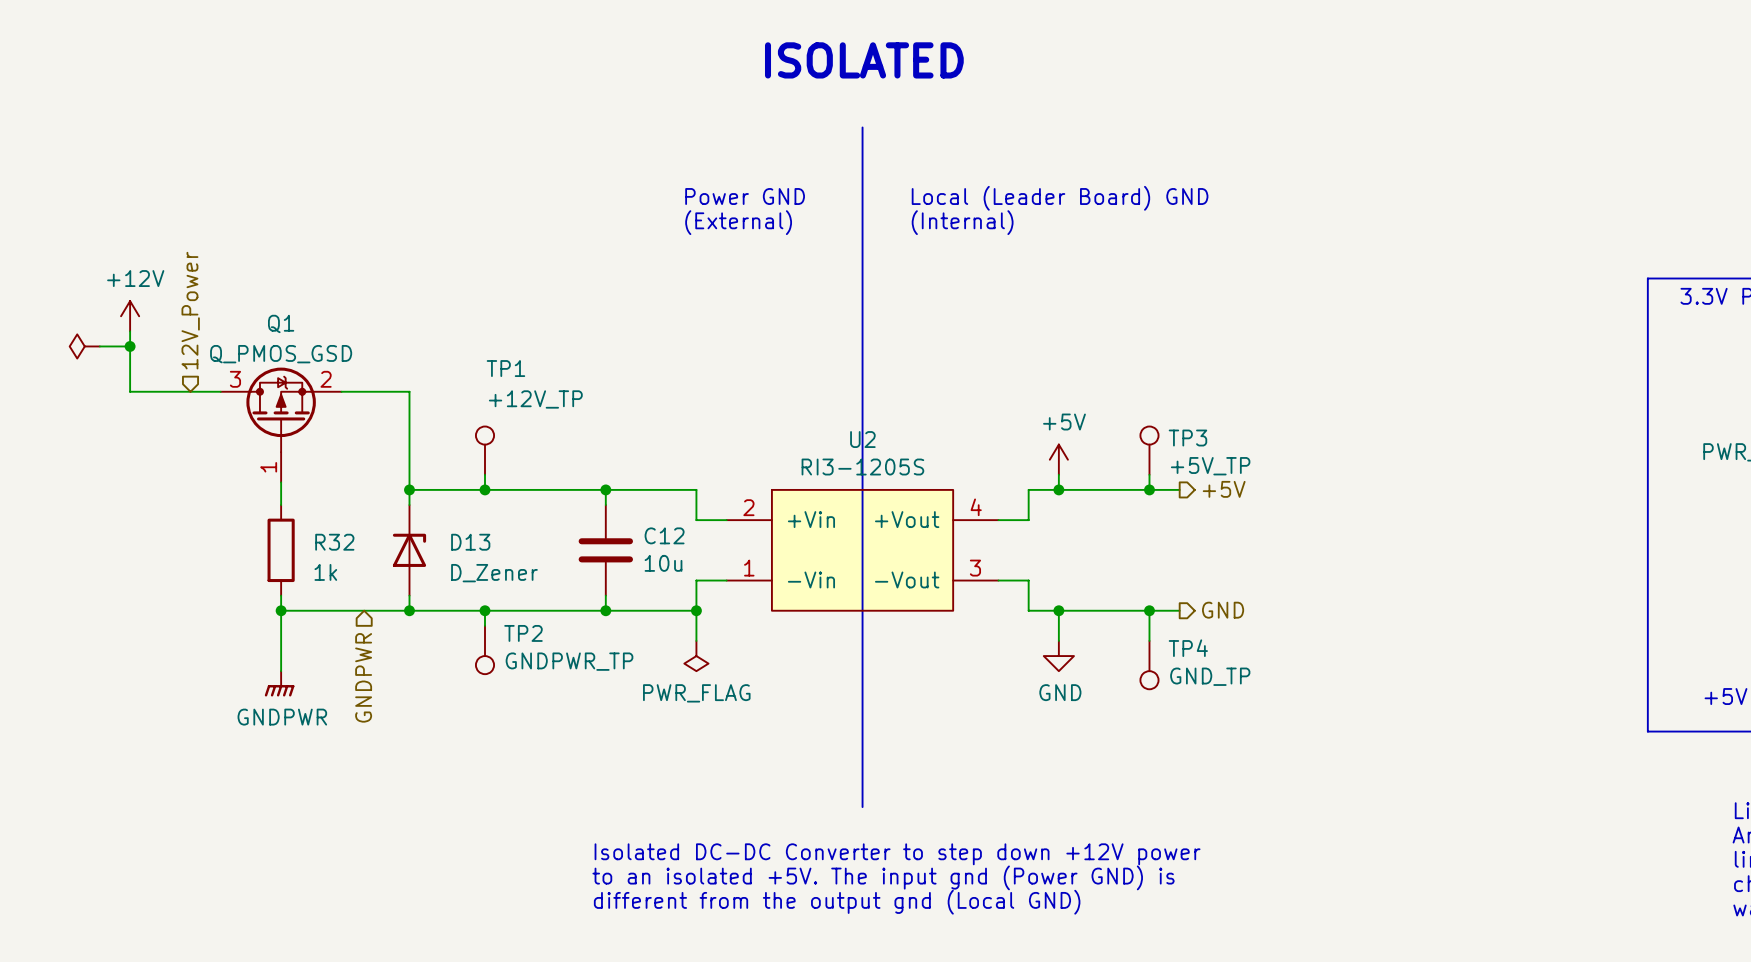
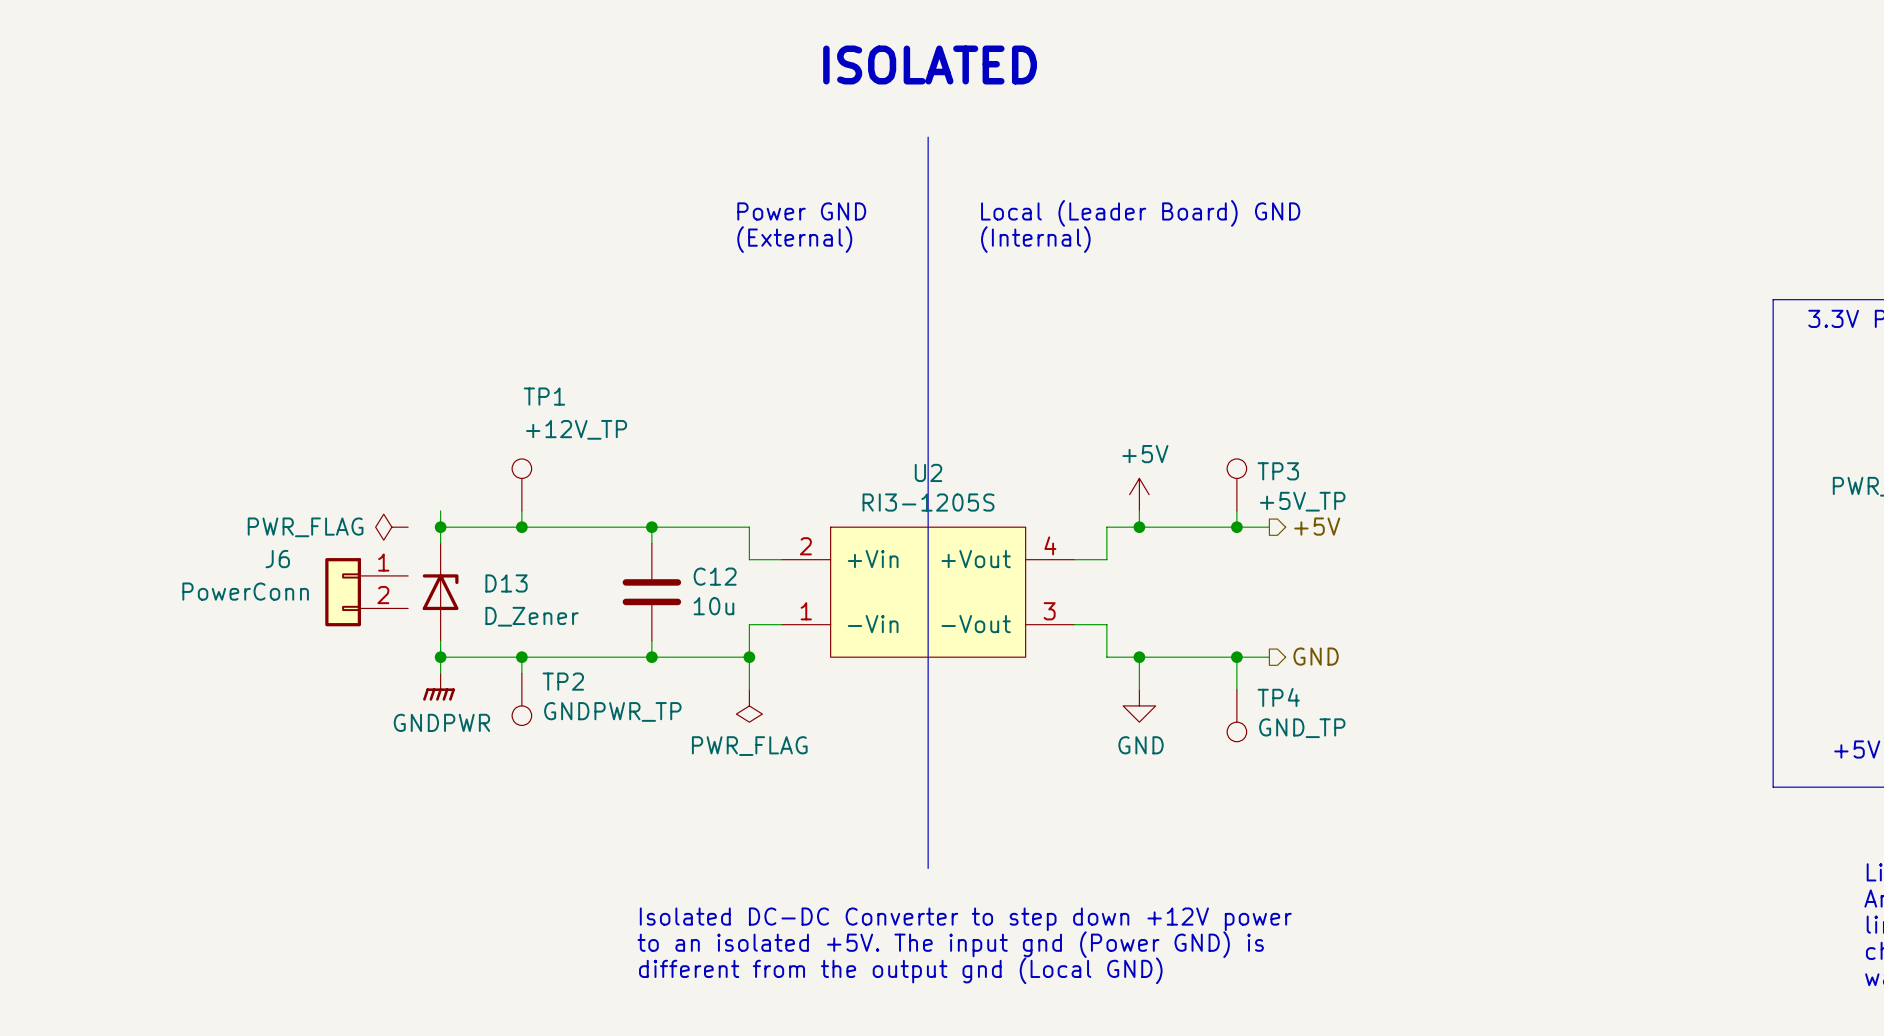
hierarchical label: 12V_Power (190, 310) -> none
power symbol: +12V (130, 316) -> none
wire: (130, 331) (130, 391) (220, 391) -> none
power symbol: (84, 346) -> none
wire: (99, 346) (130, 346) -> none
junction: (130, 346) -> none
wire: (341, 391) (409, 391) (409, 474) -> none
Q1: Q_PMOS_GSD (281, 424) -> none
wire: (281, 482) (281, 505) -> none
power symbol: none -> PWR_FLAG (391, 527)
R32: 1k (281, 550) -> none
J6: none -> PowerConn (366, 592)
wire: (281, 595) (281, 671) -> none
wire: (281, 610) (409, 610) -> (440, 673) (440, 657)
junction: (281, 610) -> none
hierarchical label: GNDPWR (363, 677) -> none
power symbol position: GNDPWR (279, 683) -> GNDPWR (439, 687)

